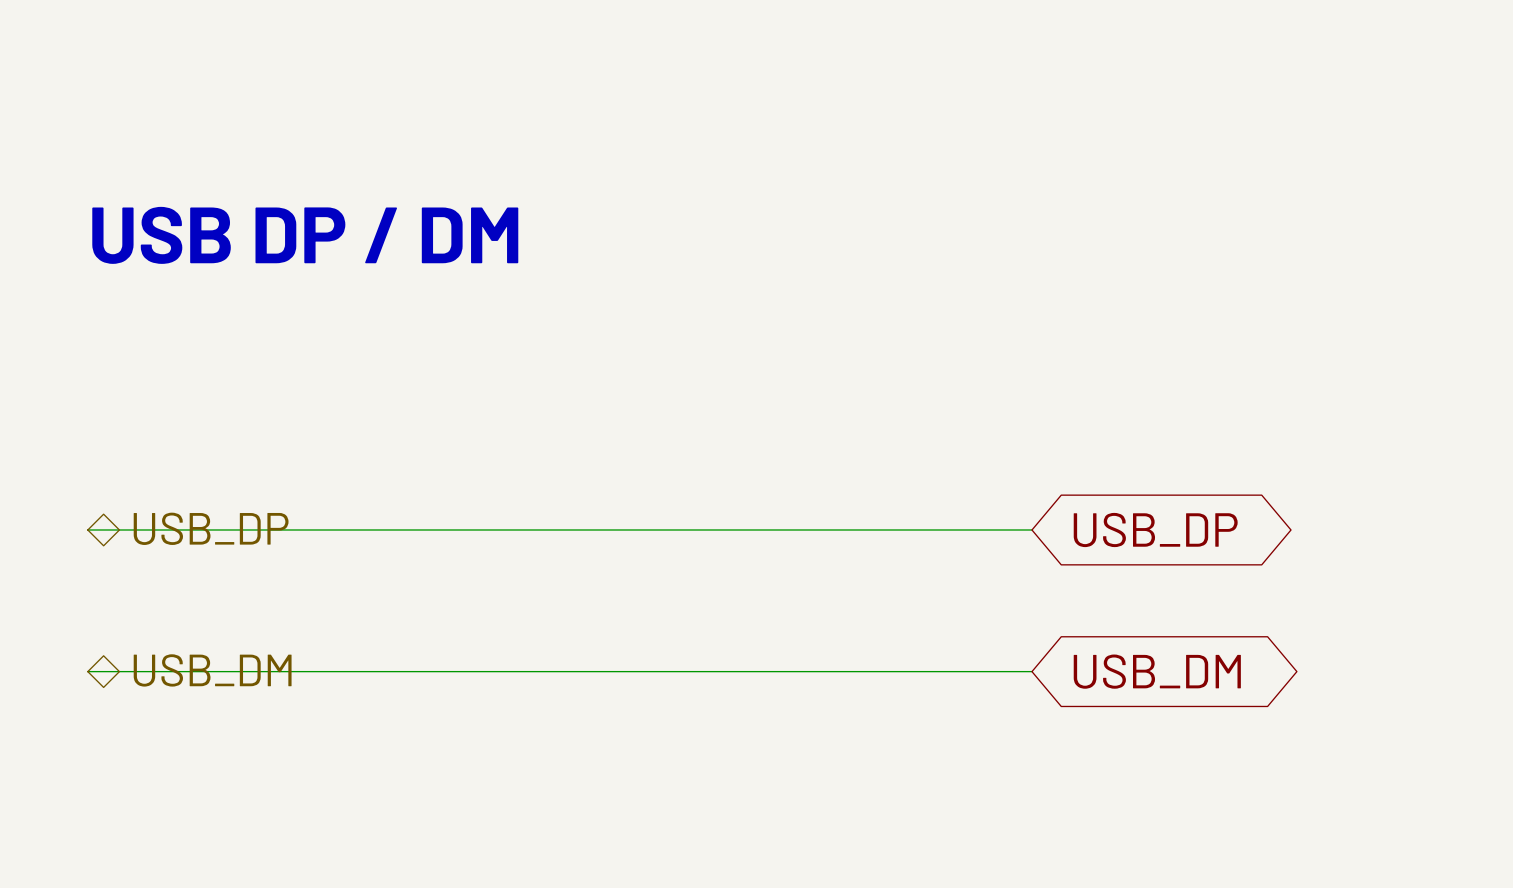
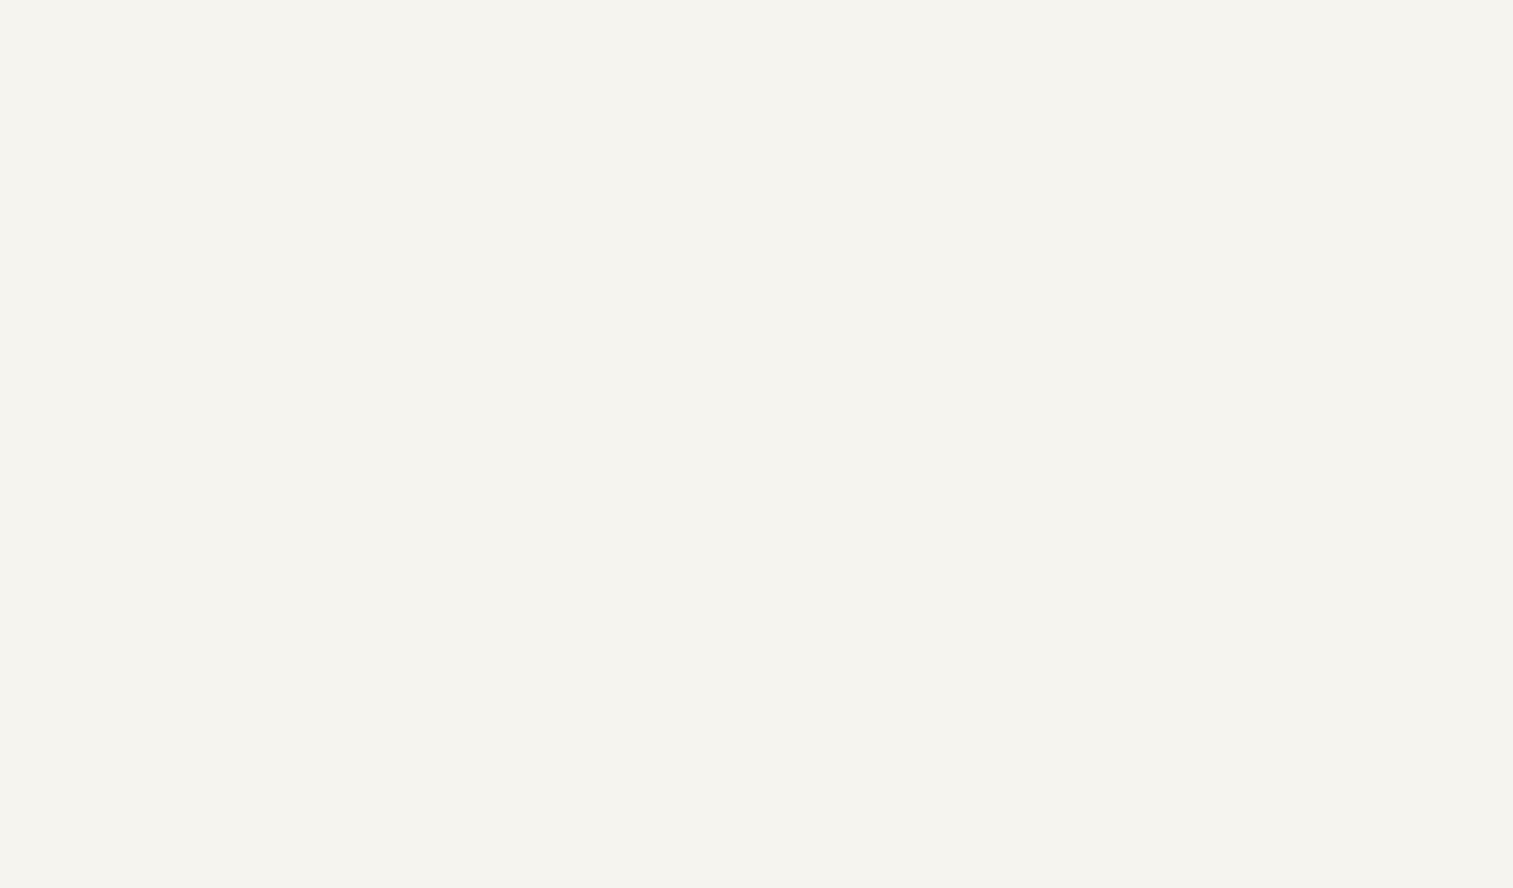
text: USB DP / DM (305, 235) -> none
hierarchical label: USB_DP (211, 528) -> none
wire: (87, 529) (1031, 529) -> none
global label: USB_DP (1155, 529) -> none
hierarchical label: USB_DM (212, 670) -> none
wire: (87, 671) (1031, 671) -> none
global label: USB_DM (1157, 671) -> none

